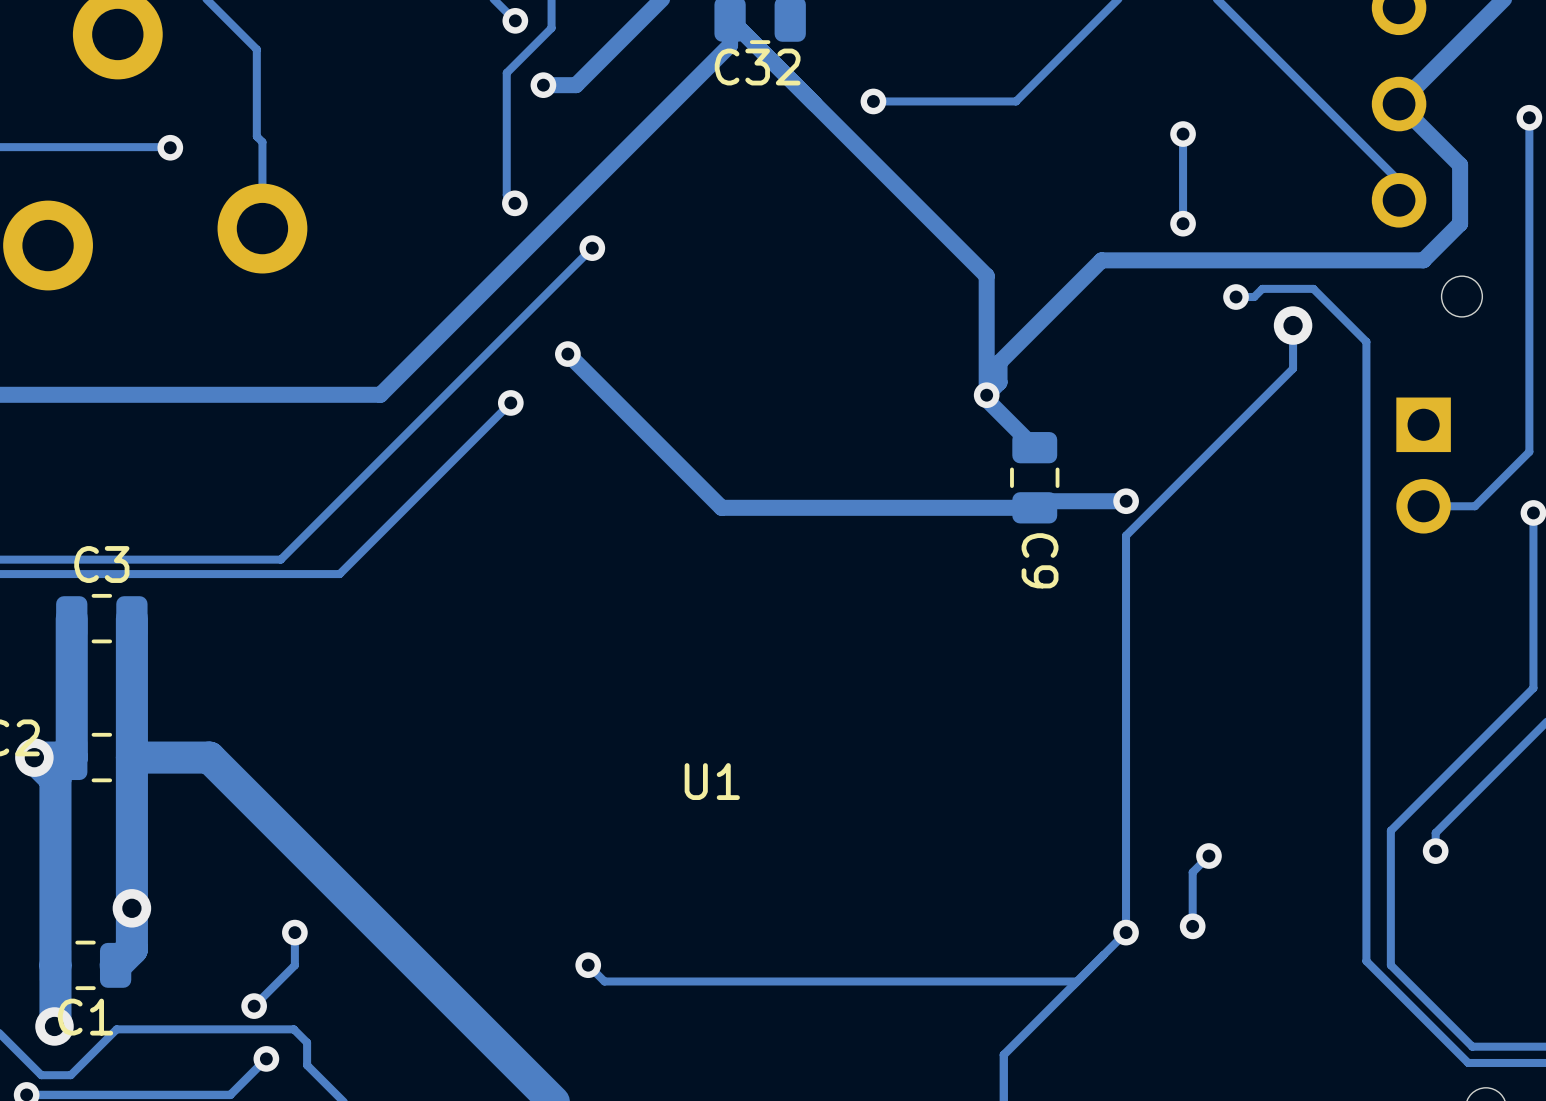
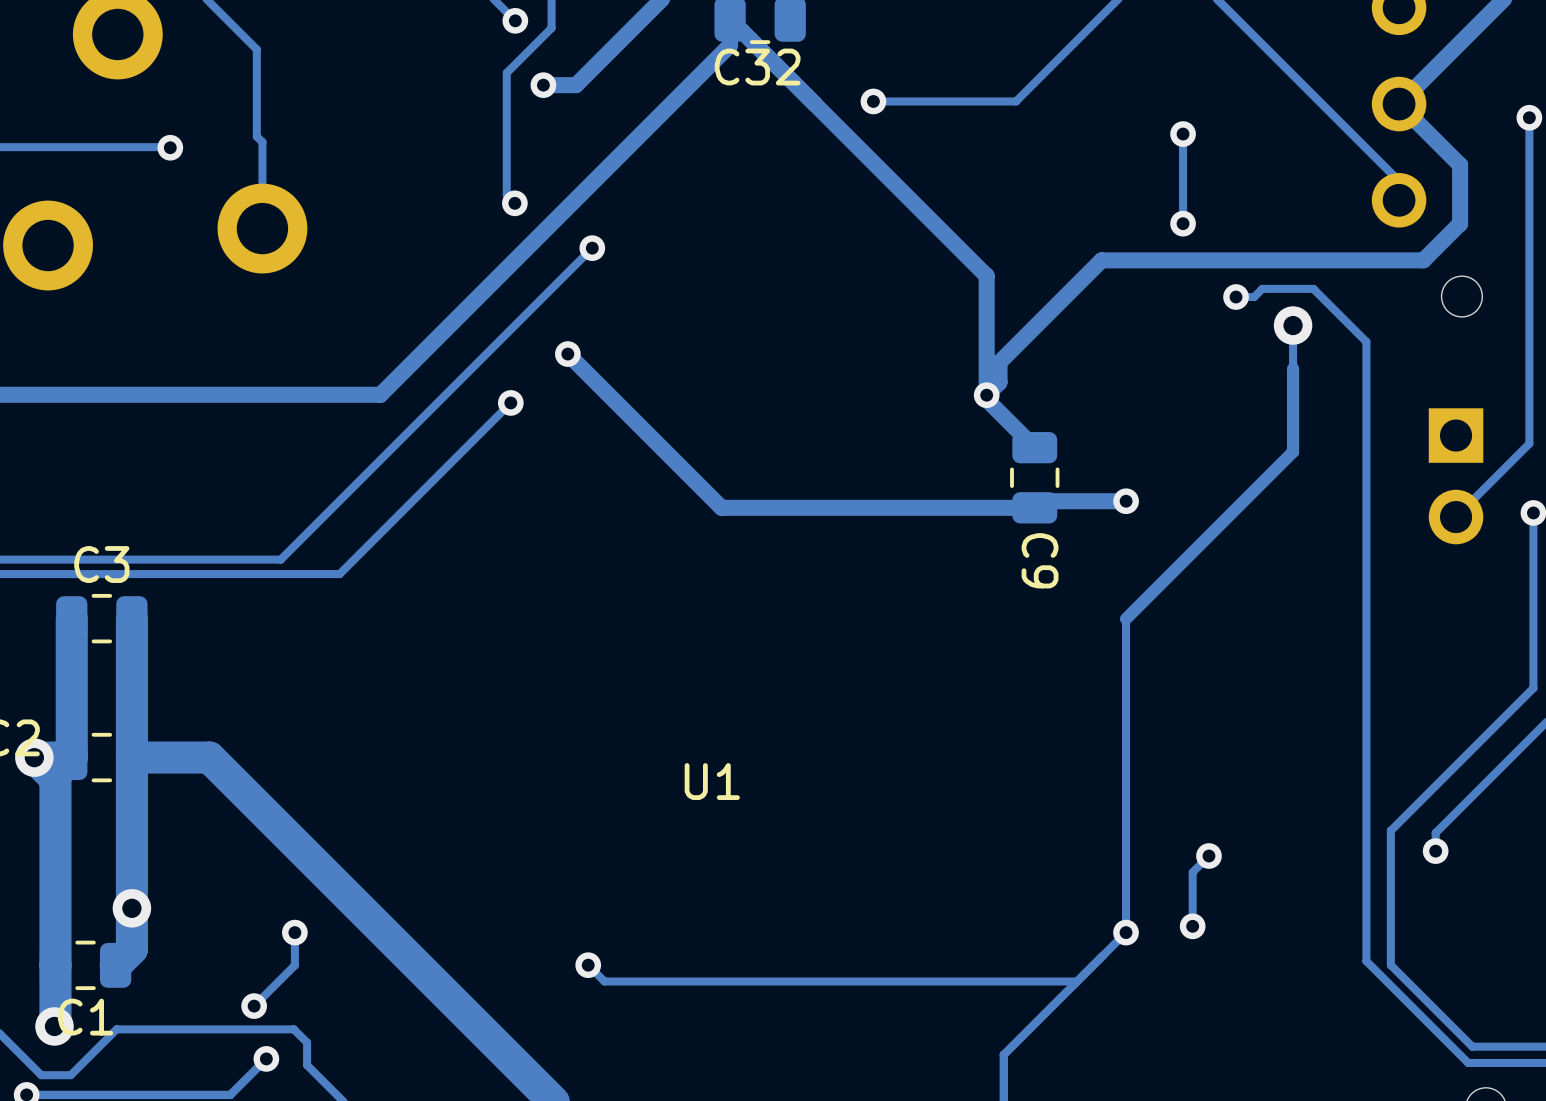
track: (1293, 368) (1126, 535) (1126, 618) -> (1293, 368) (1293, 451) (1126, 618)
track: (1529, 443) (1529, 451) (1474, 506) (1423, 506) -> (1529, 443) (1456, 517)
part position: (1423, 465) -> (1456, 476)

